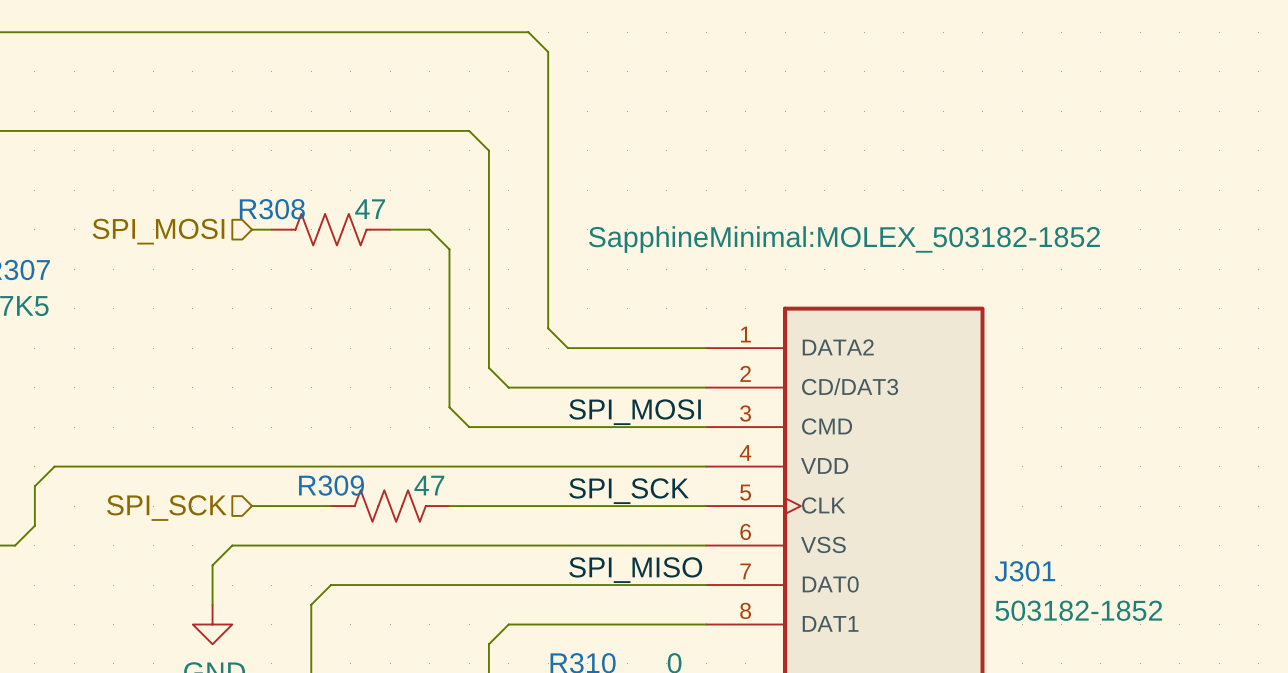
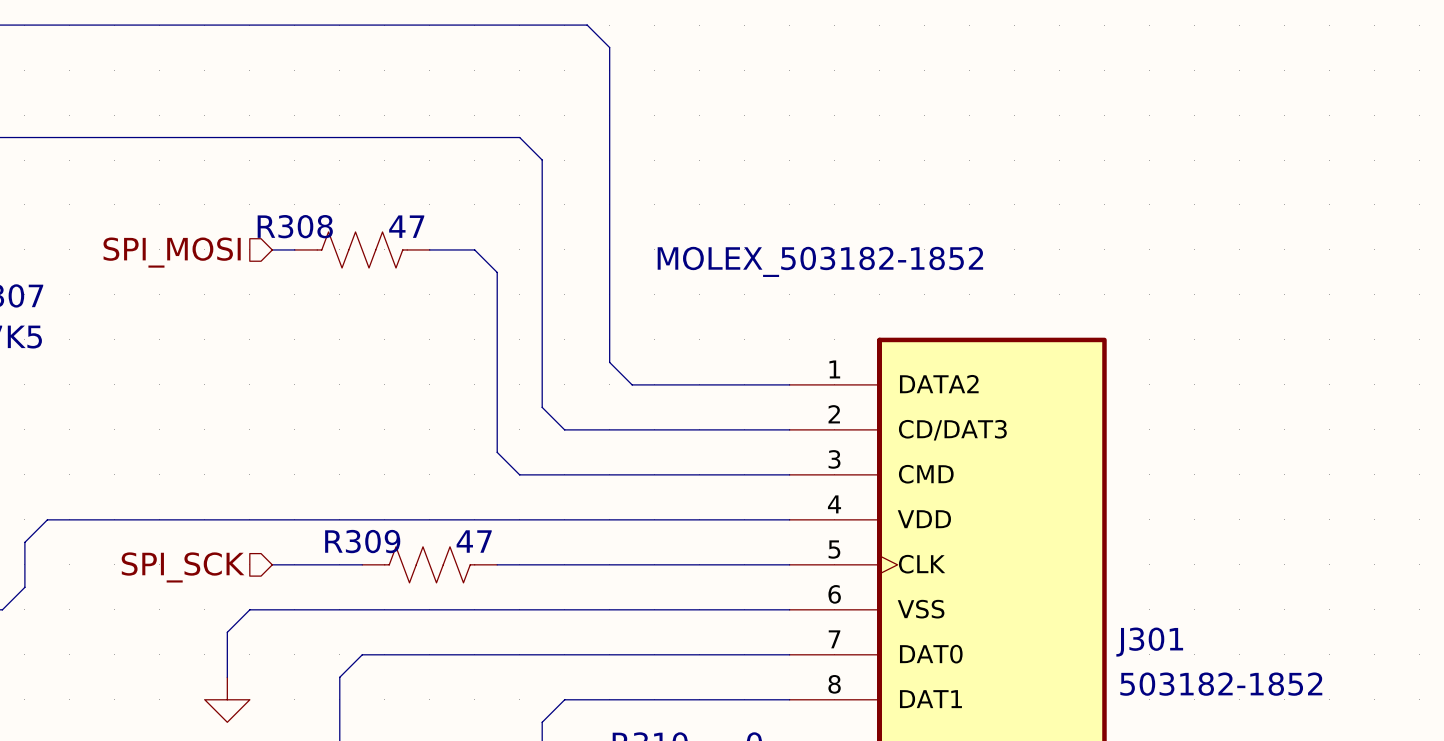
J301 text: SapphineMinimal:MOLEX_503182-1852 (844, 239) -> MOLEX_503182-1852 (820, 261)
label: SPI_MOSI (635, 412) -> none
label: SPI_SCK (629, 491) -> none
label: SPI_MISO (635, 570) -> none

